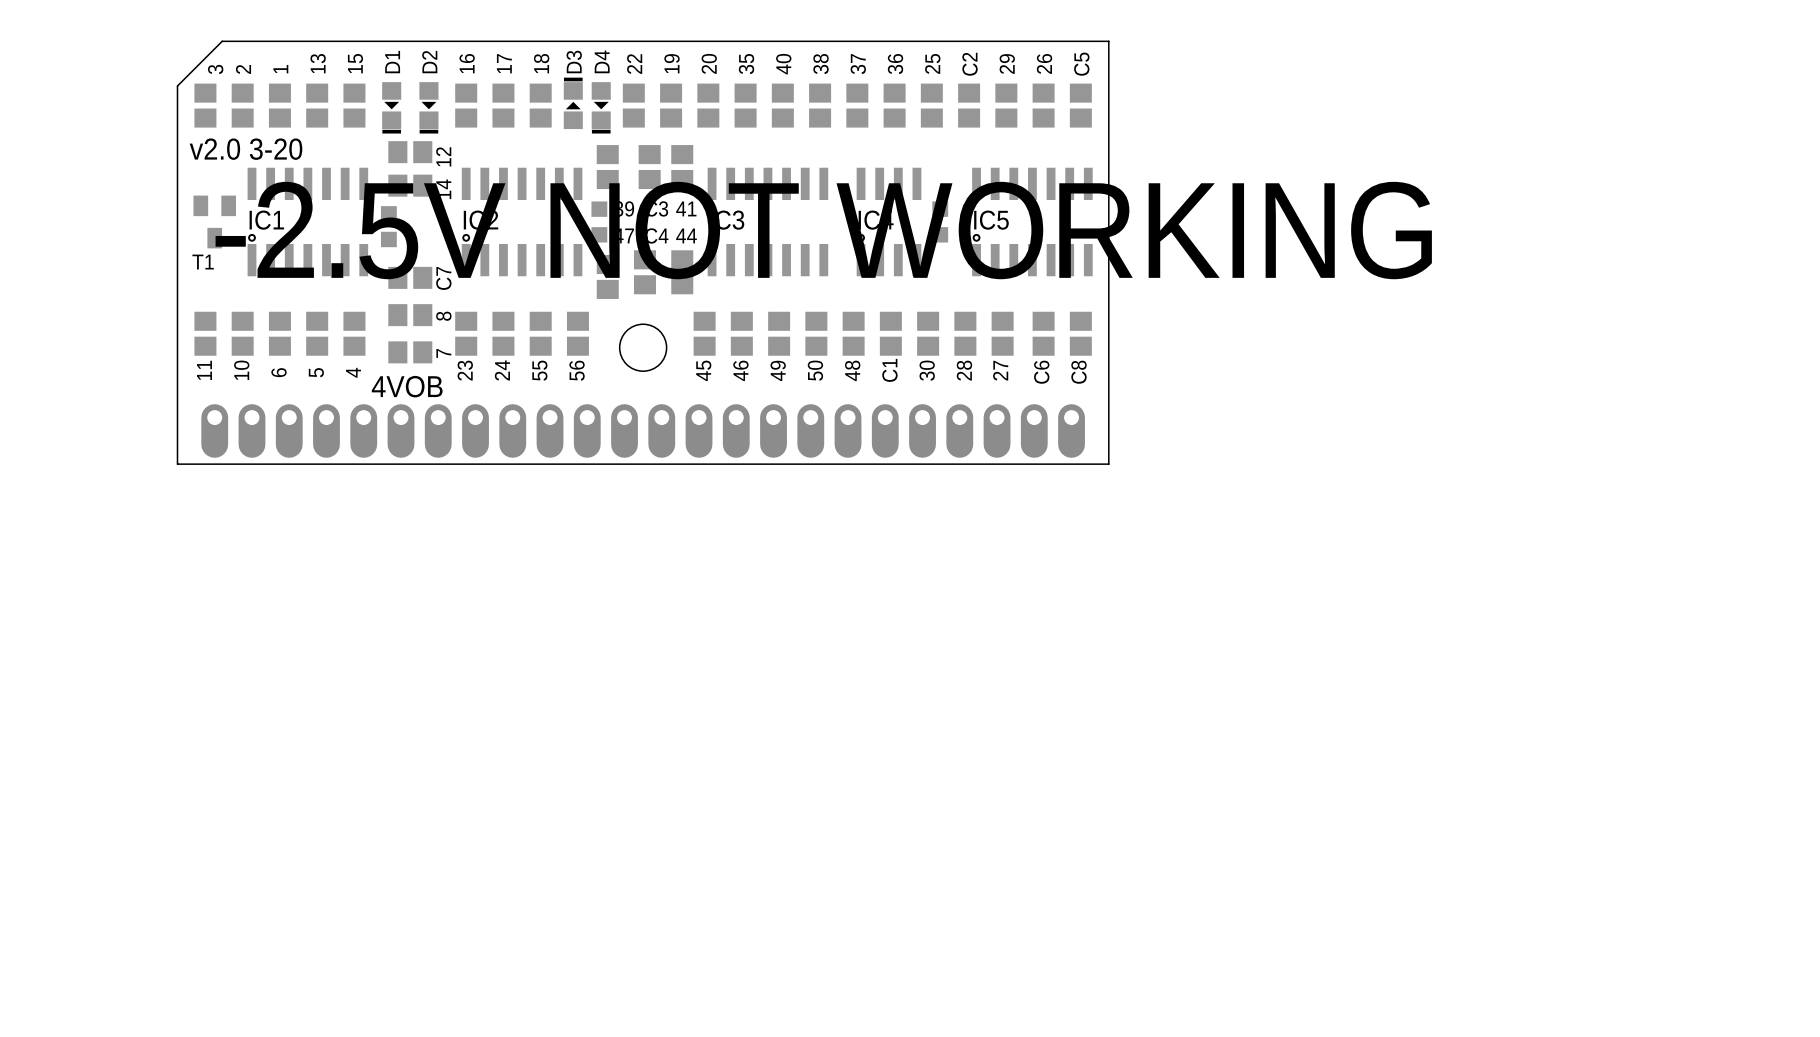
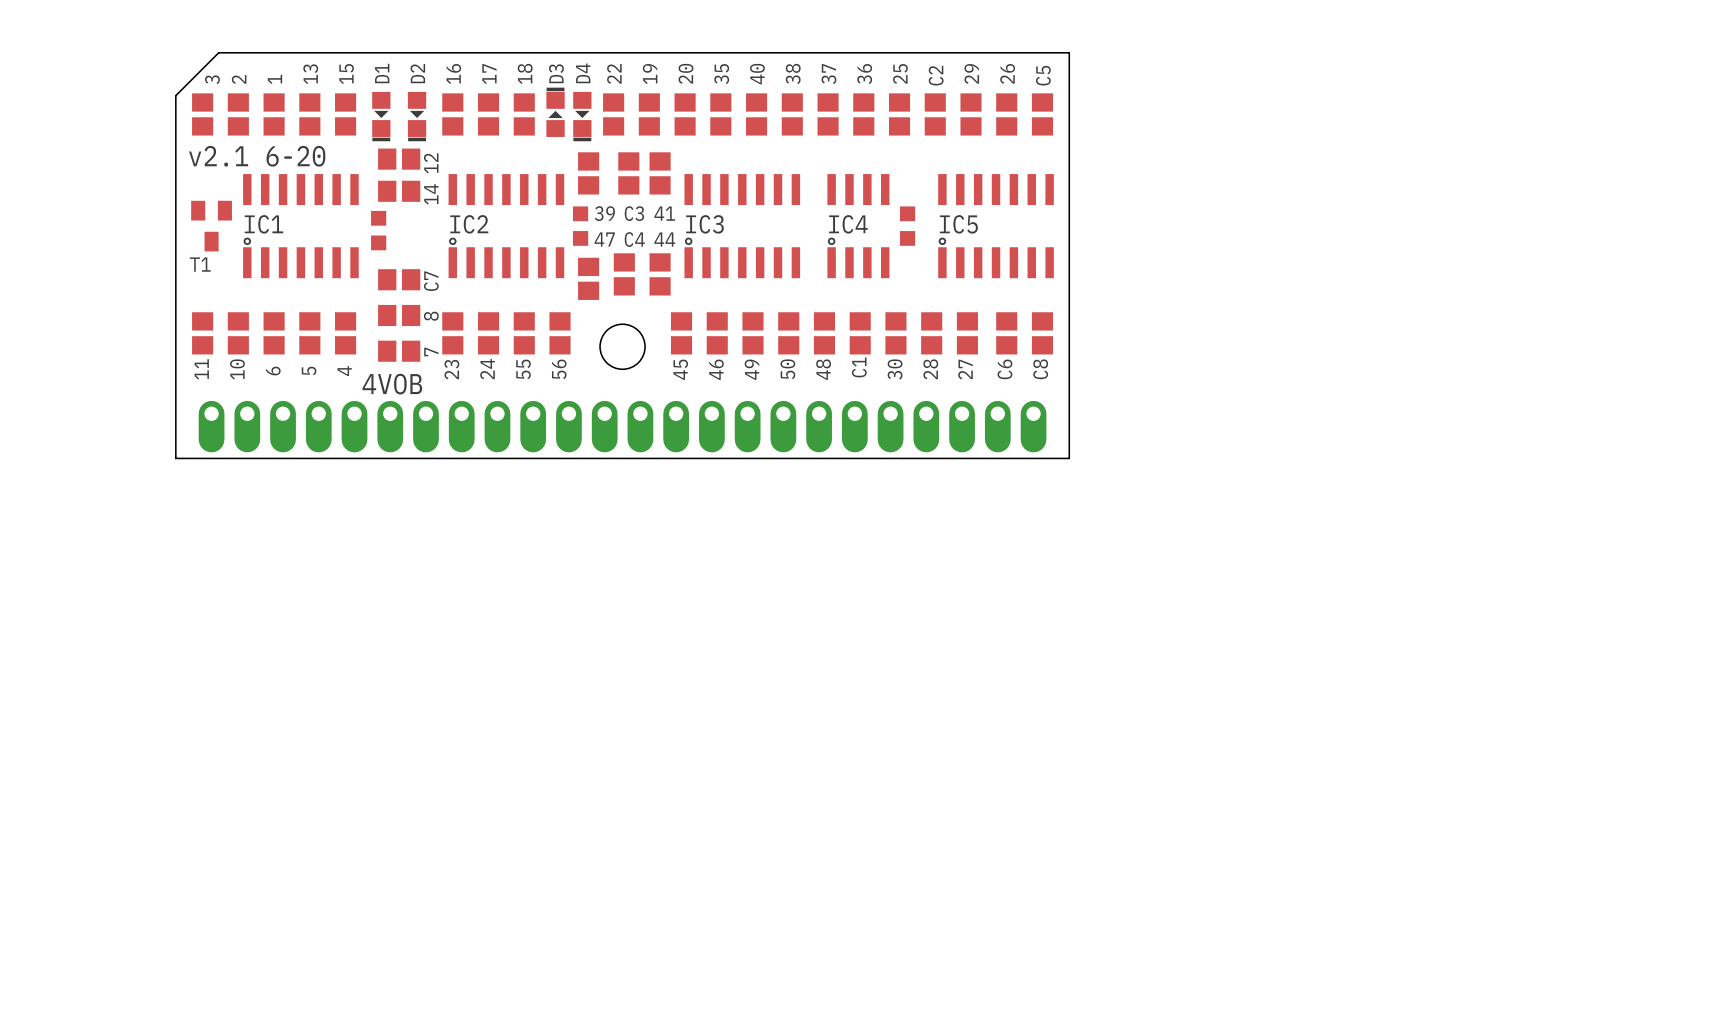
text: v2.0 3-20 (246, 149) -> v2.1 6-20 (257, 156)
text: -2.5V NOT WORKING (823, 230) -> none

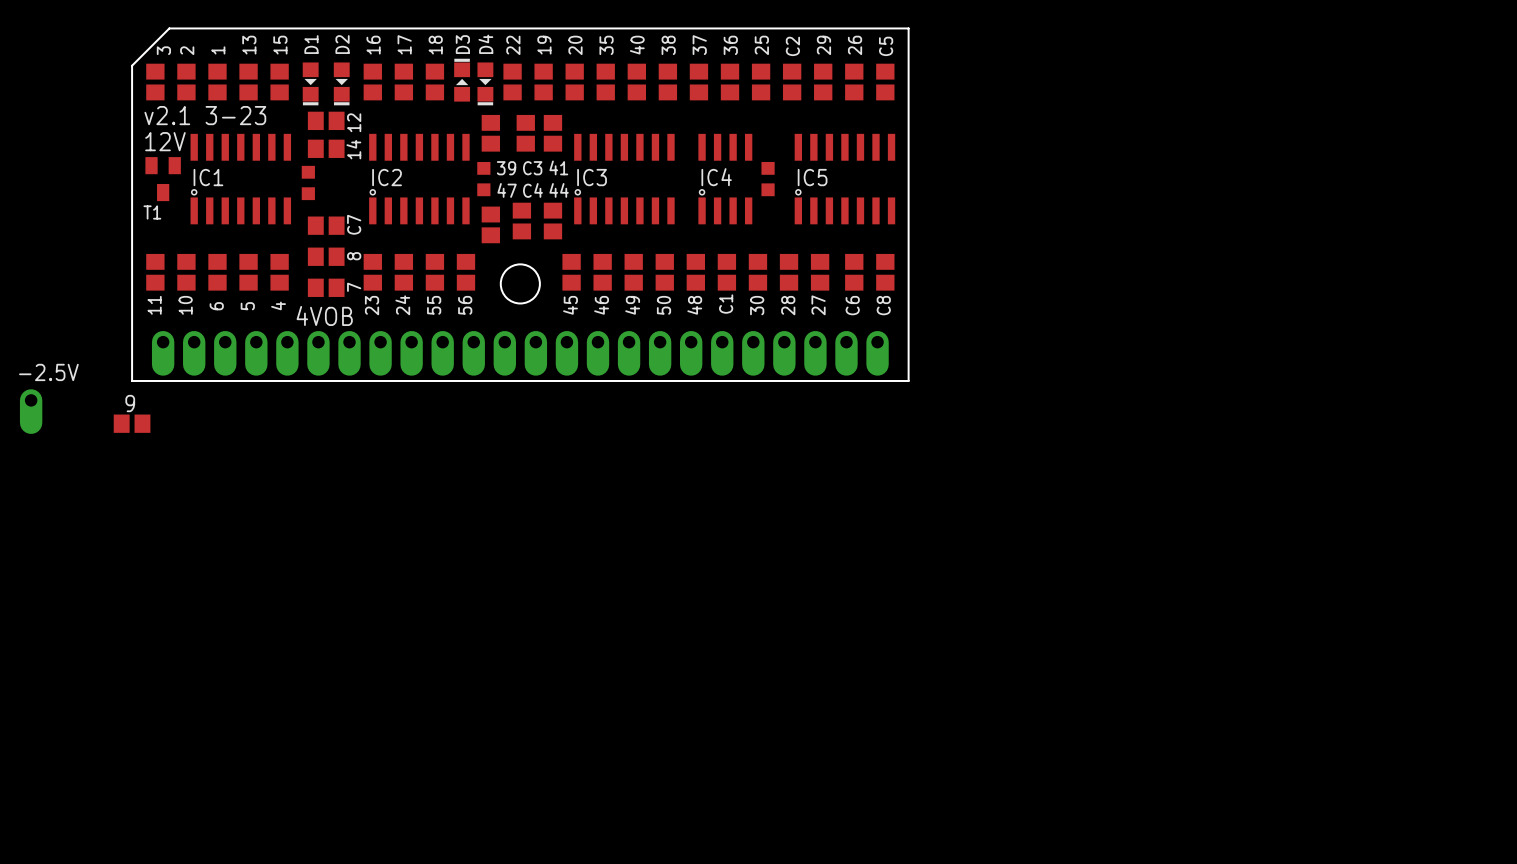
text: v2.1 6-20 (257, 156) -> v2.1 3-23 (205, 115)
text: none -> 12V (165, 141)
-2.5V: none -> (31, 411)
9: none -> (132, 423)

